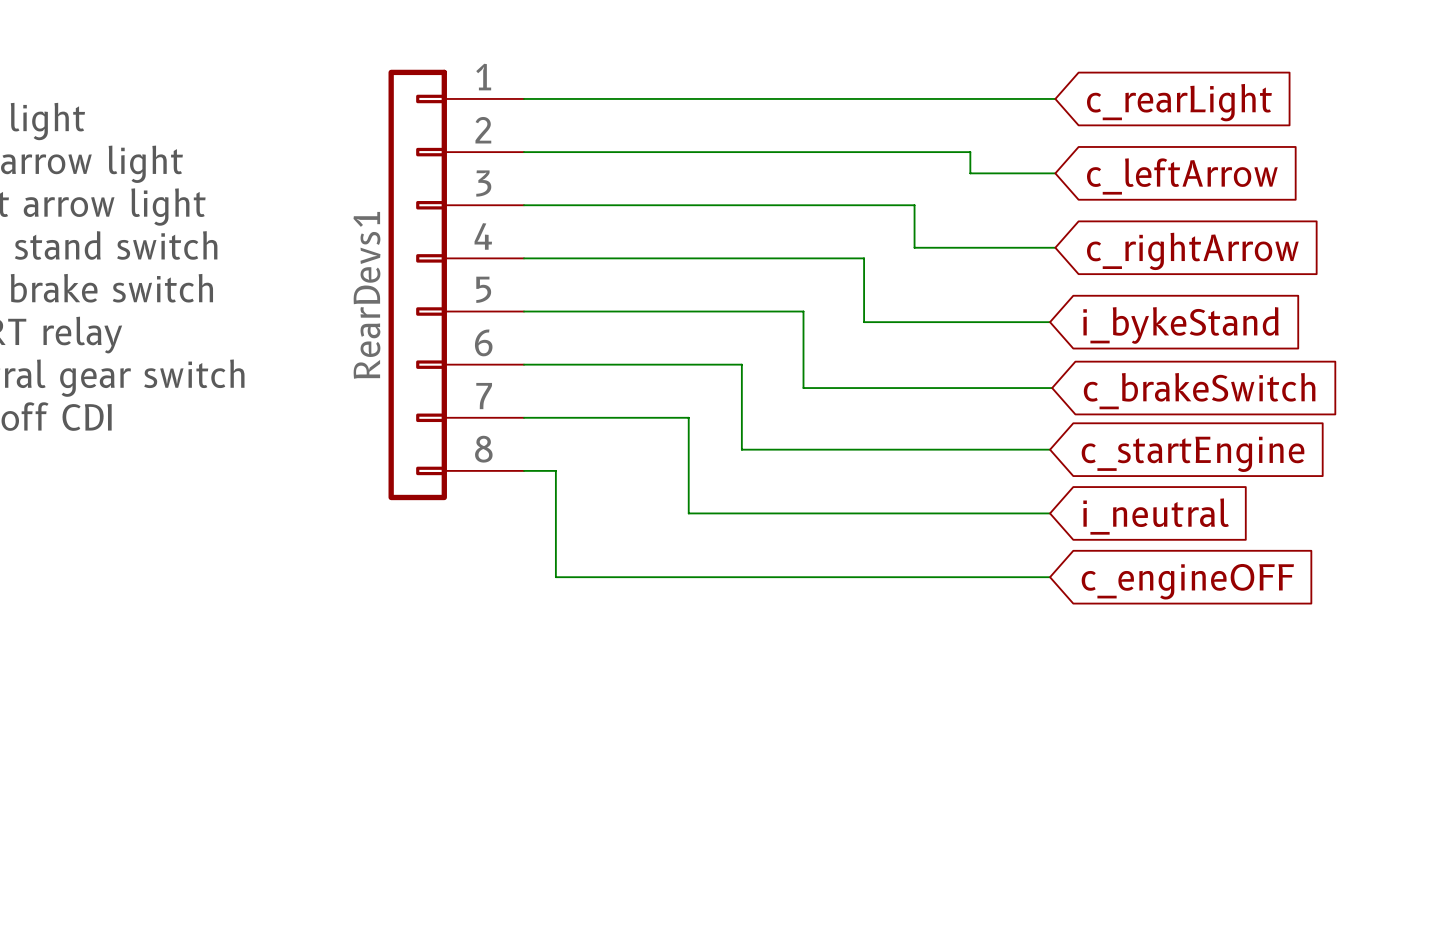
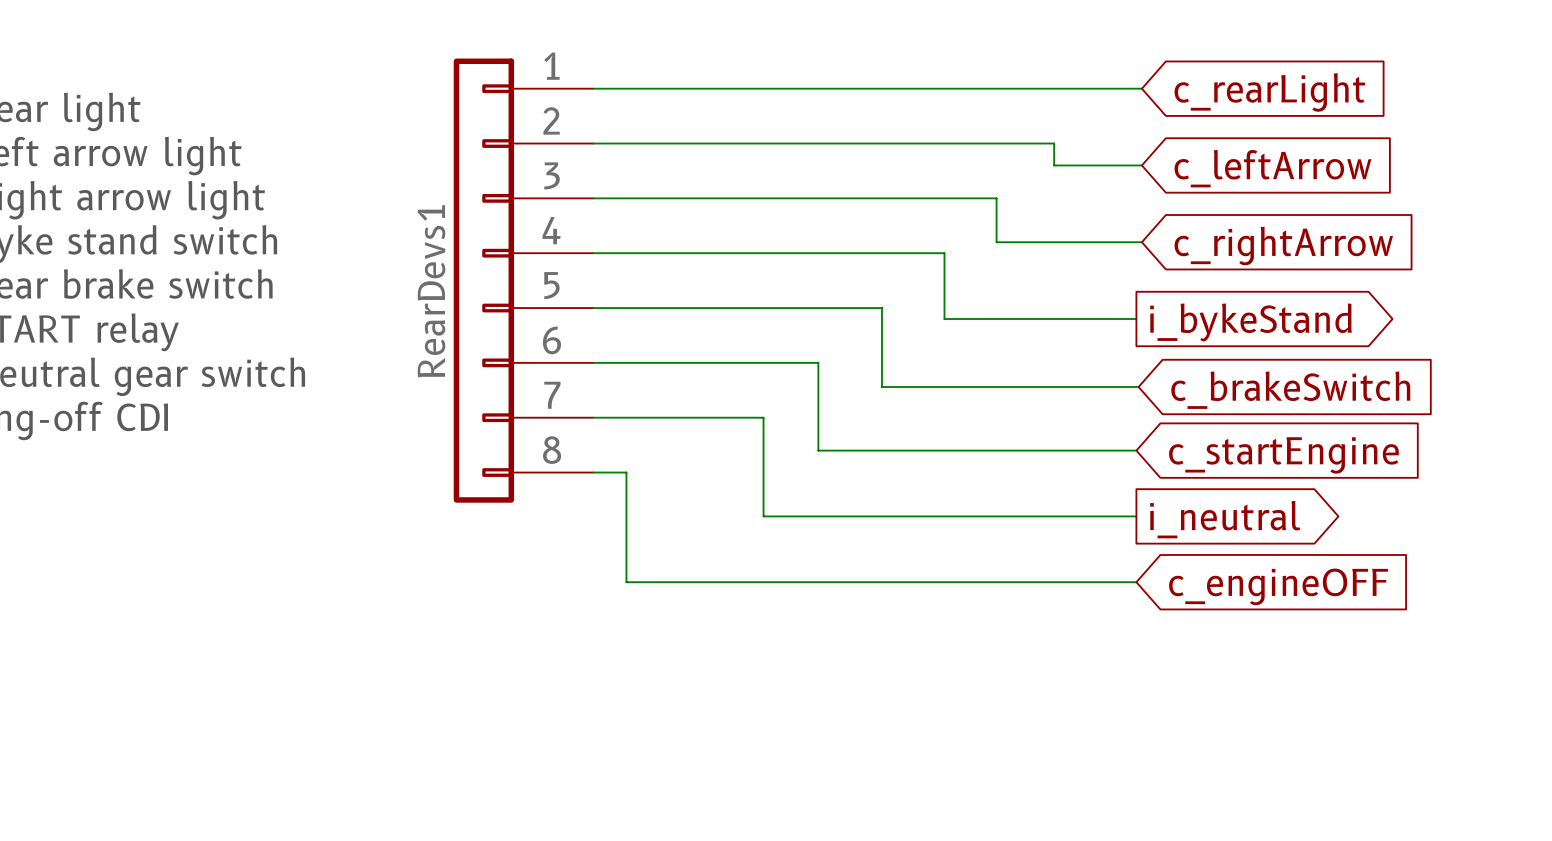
global label shape: input (1180, 325) -> output (1250, 322)
global label shape: input (1156, 516) -> output (1225, 519)

